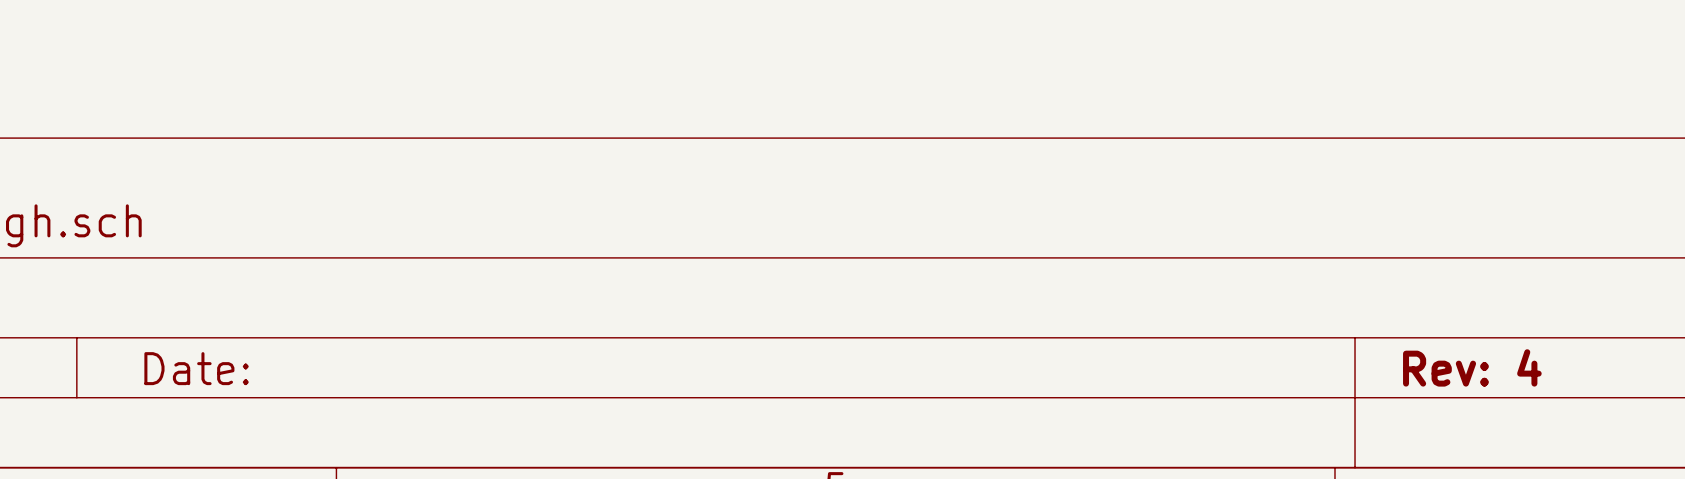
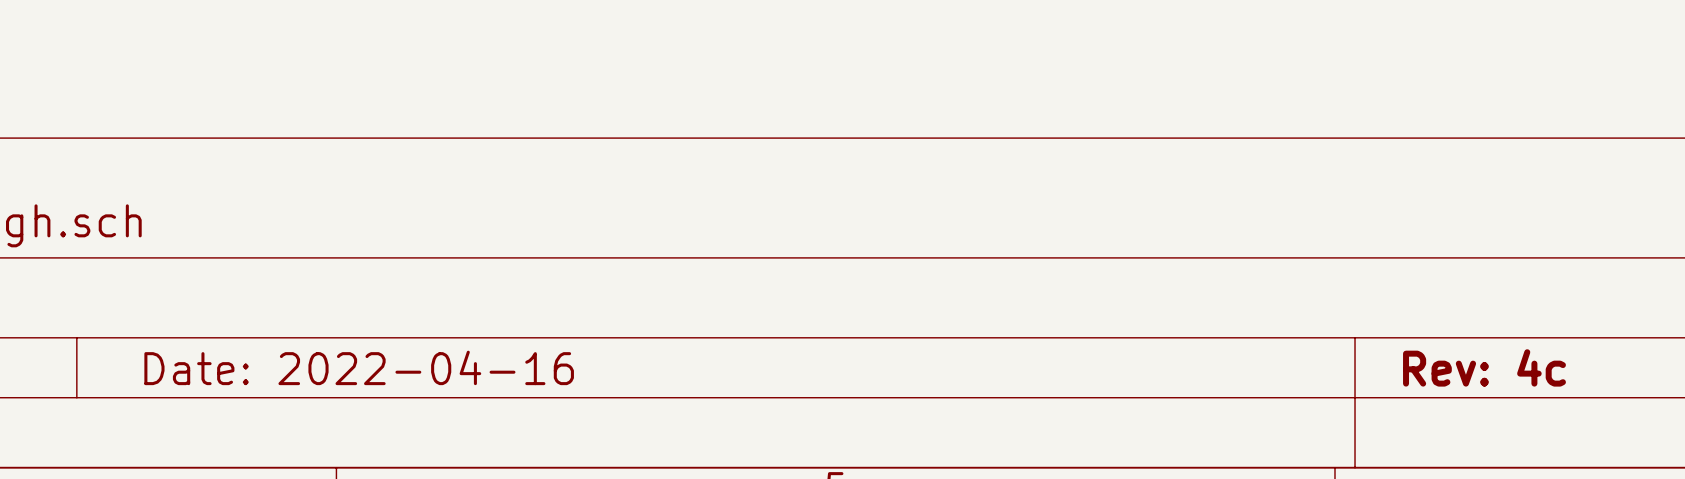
title block: Rev: 4 (1472, 367) -> Rev: 4c (1484, 367)
title block: Date: (196, 368) -> Date: 2022-04-16 (359, 367)

